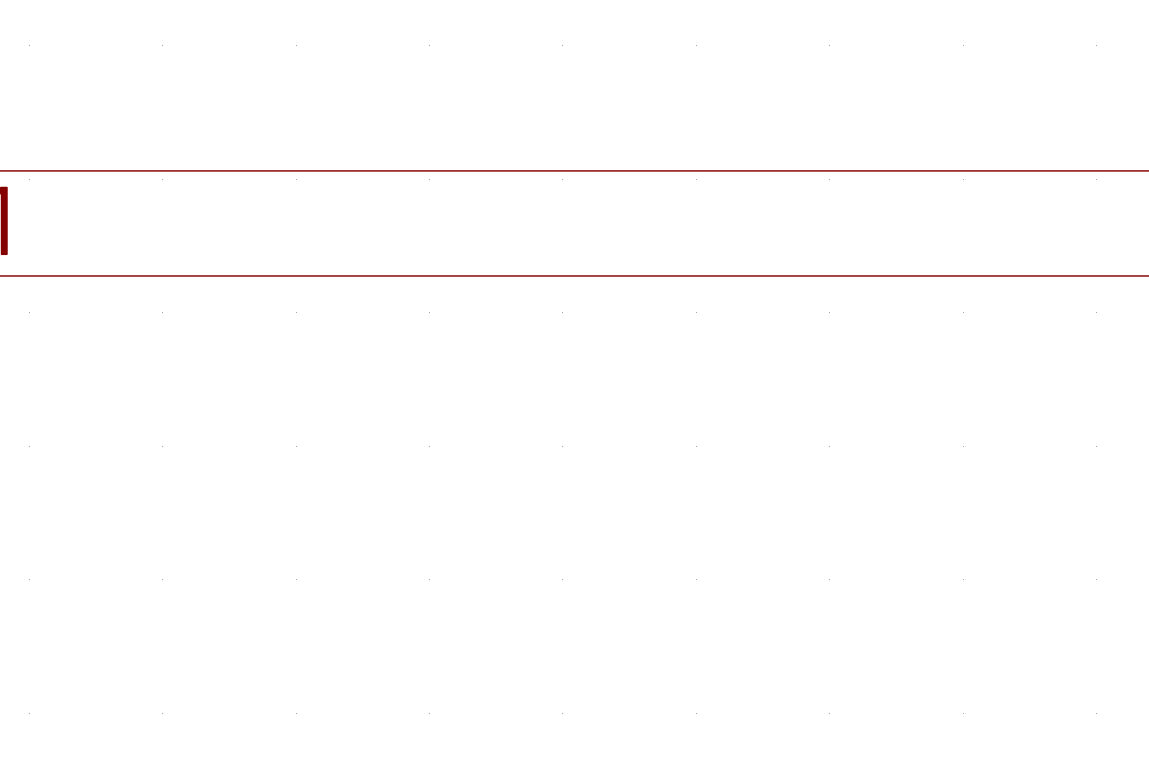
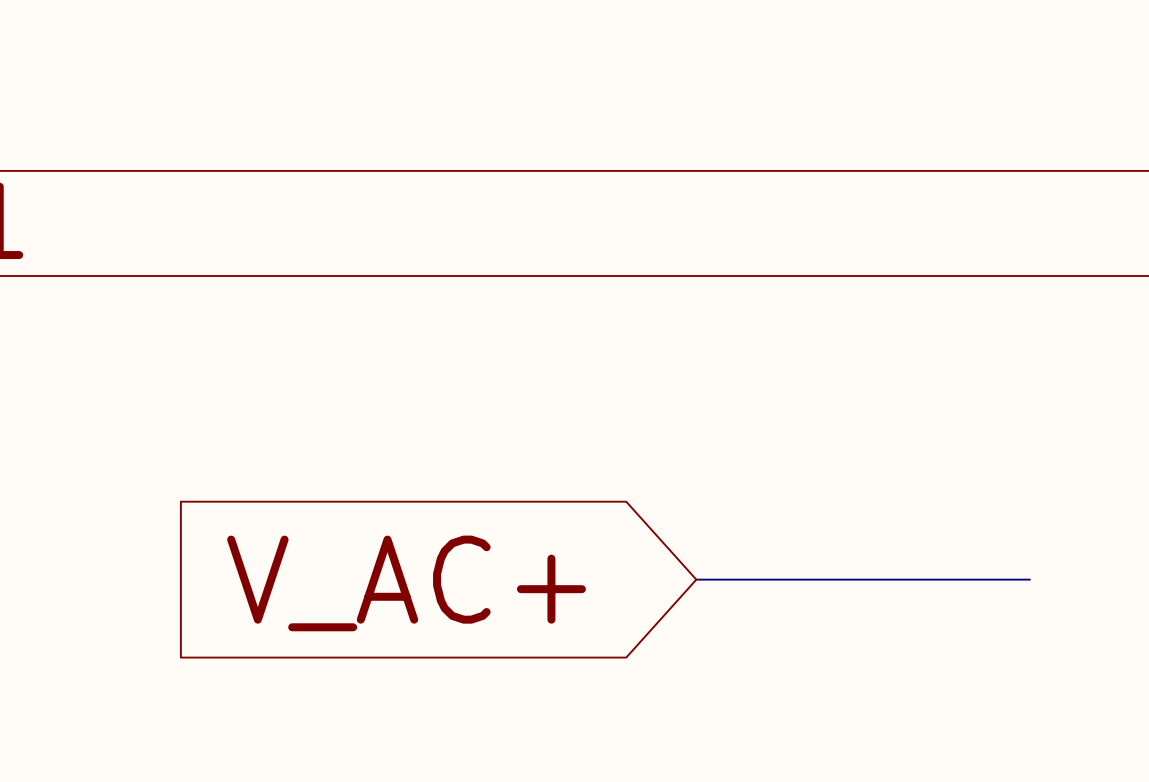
global label: none -> V_AC+ (406, 583)
wire: none -> (696, 579) (1029, 579)

